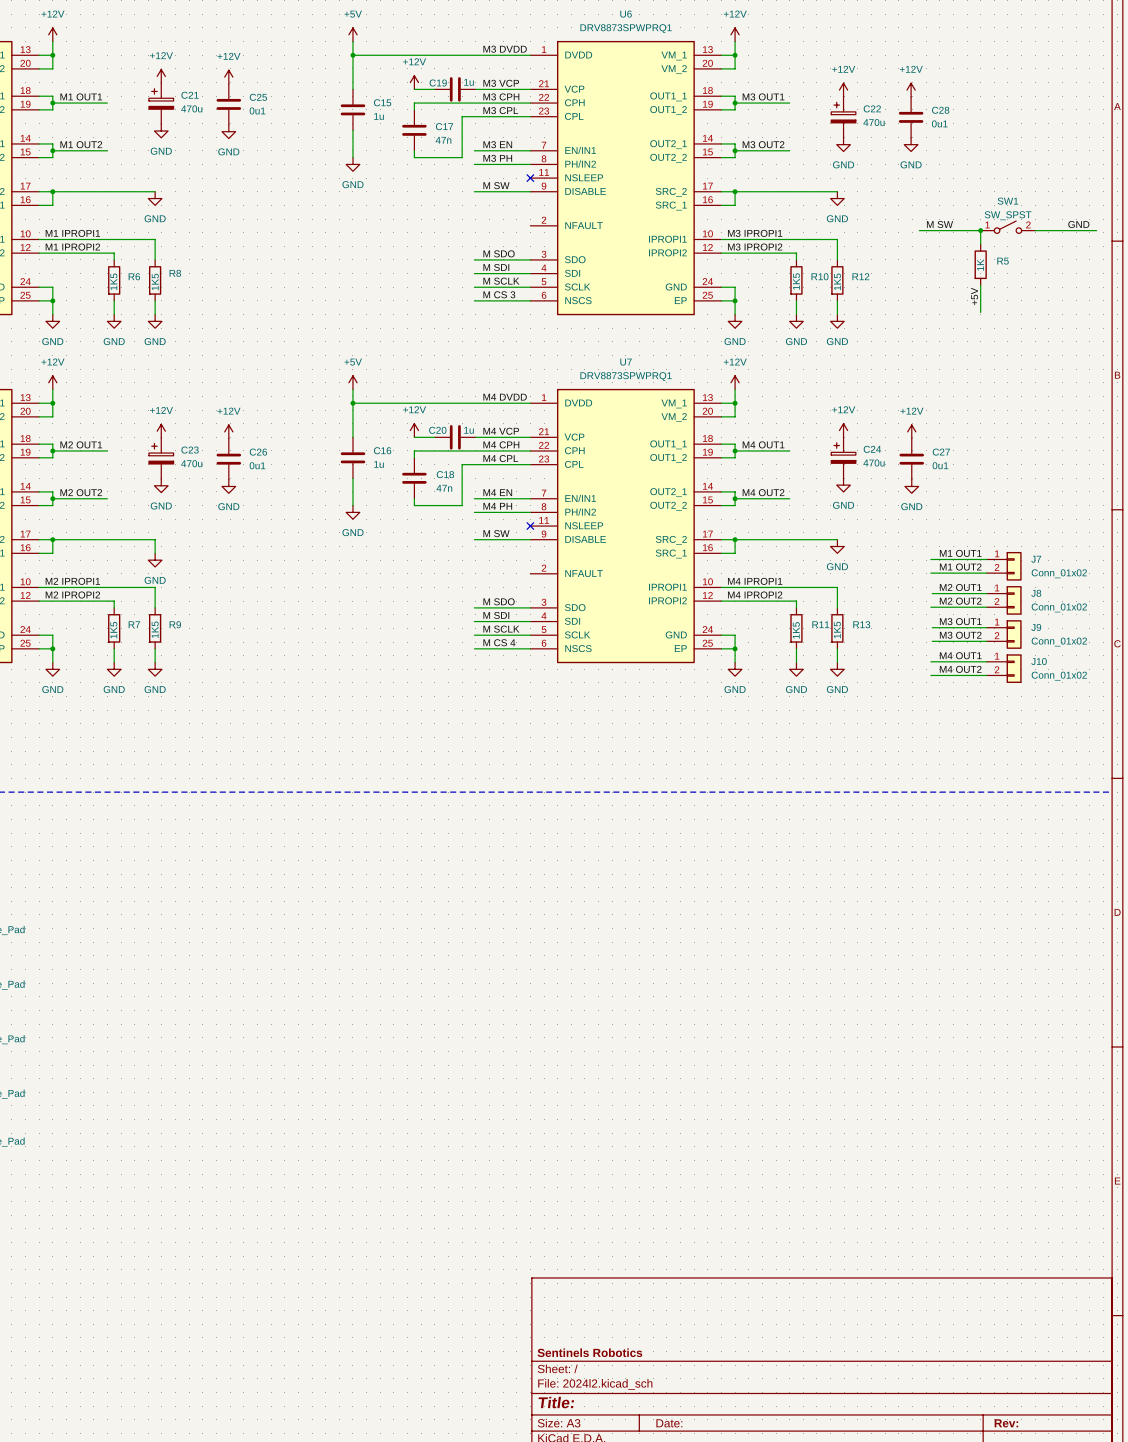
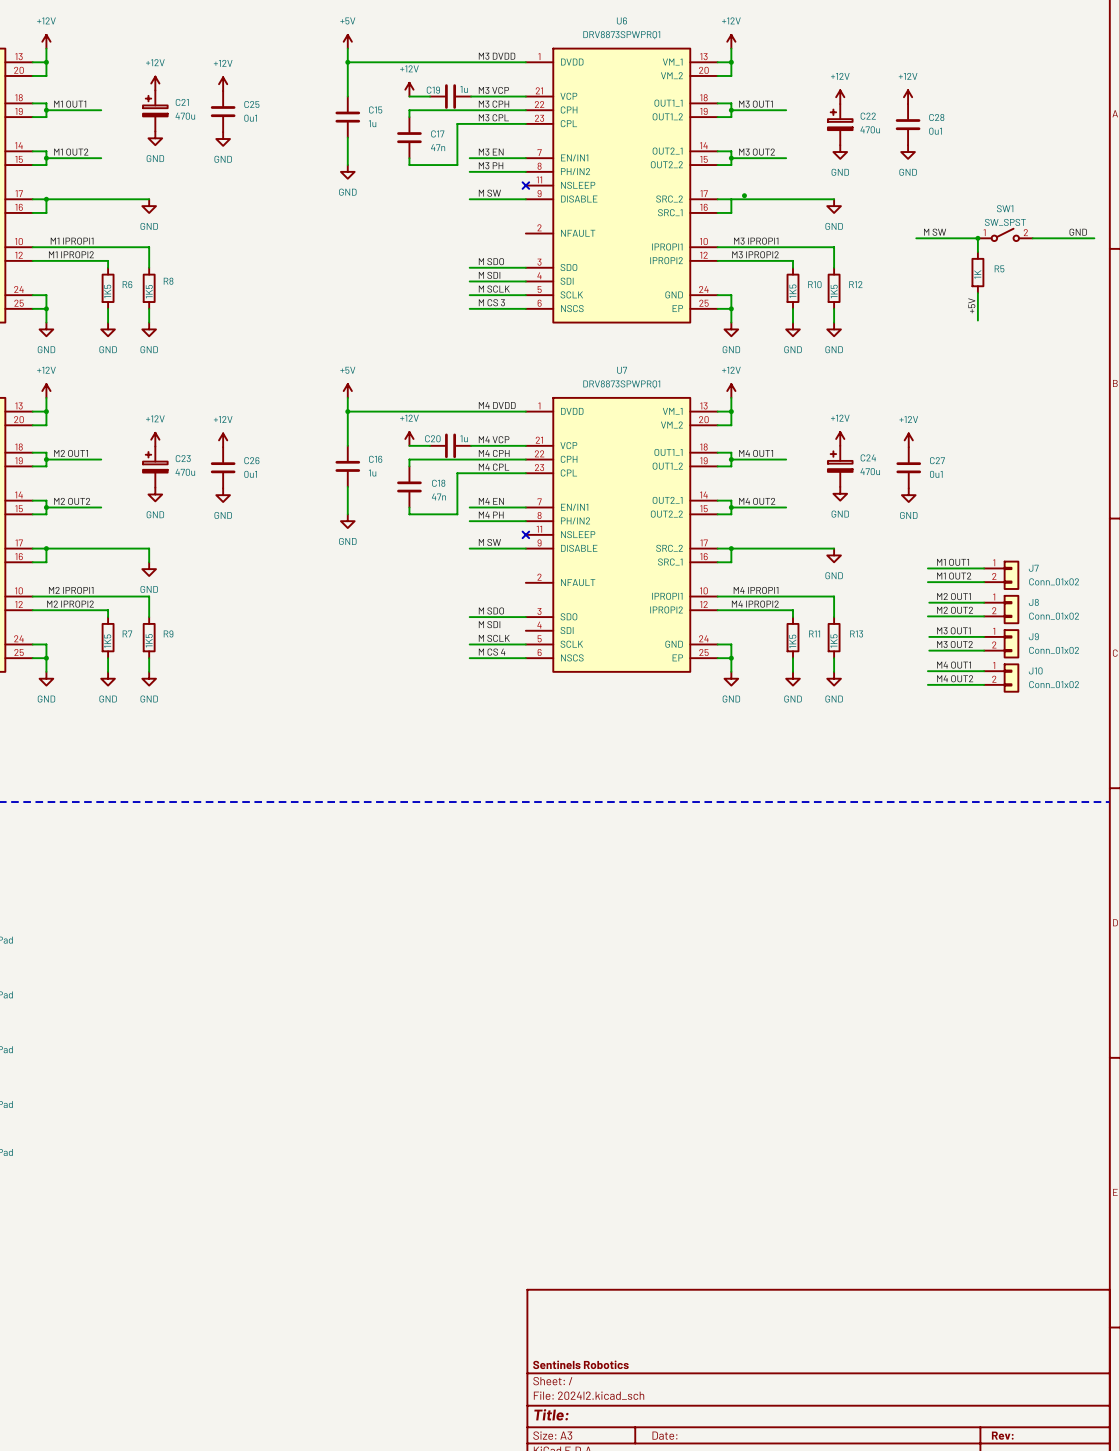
junction position: (735, 191) -> (744, 195)
wire: (474, 621) (530, 621) -> none

